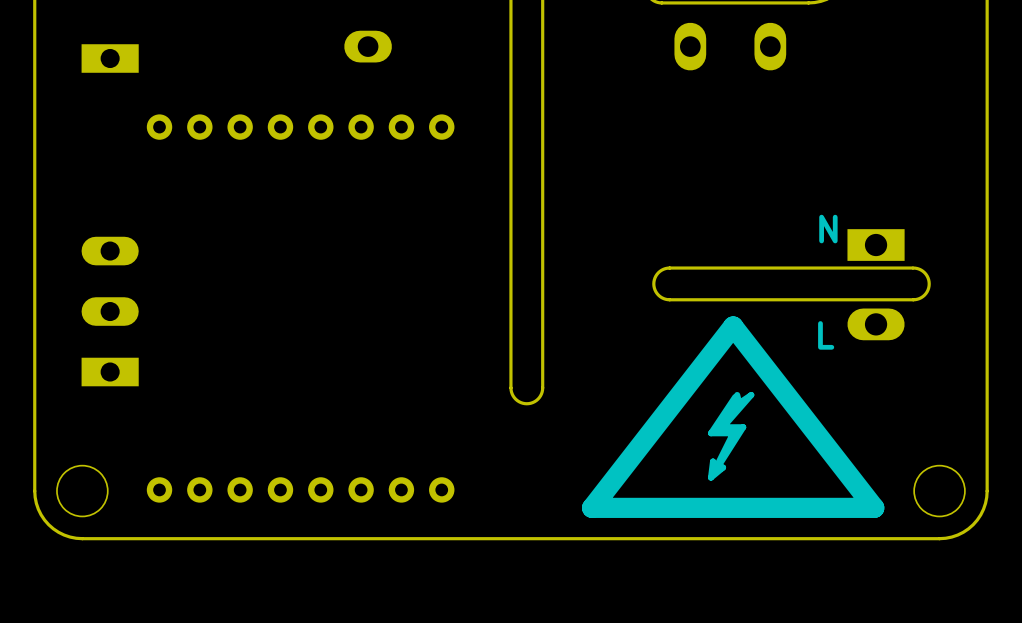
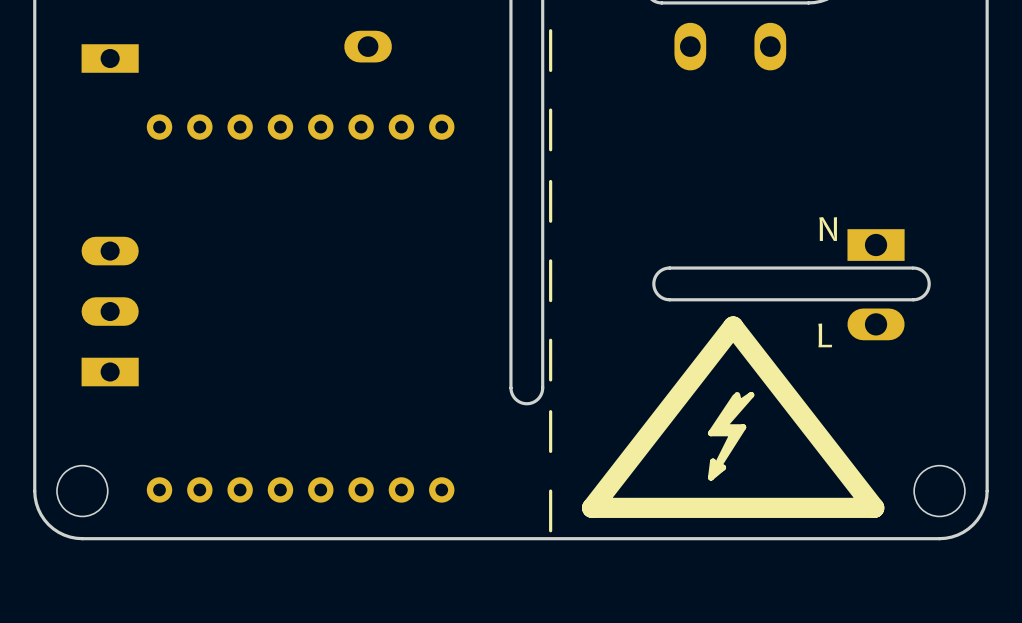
line: none -> (550, 30) (550, 70)
line: none -> (550, 110) (550, 149)
line: none -> (550, 181) (550, 221)
line: none -> (550, 260) (550, 300)
line: none -> (550, 340) (550, 379)
line: none -> (550, 411) (550, 451)
line: none -> (550, 491) (550, 530)

